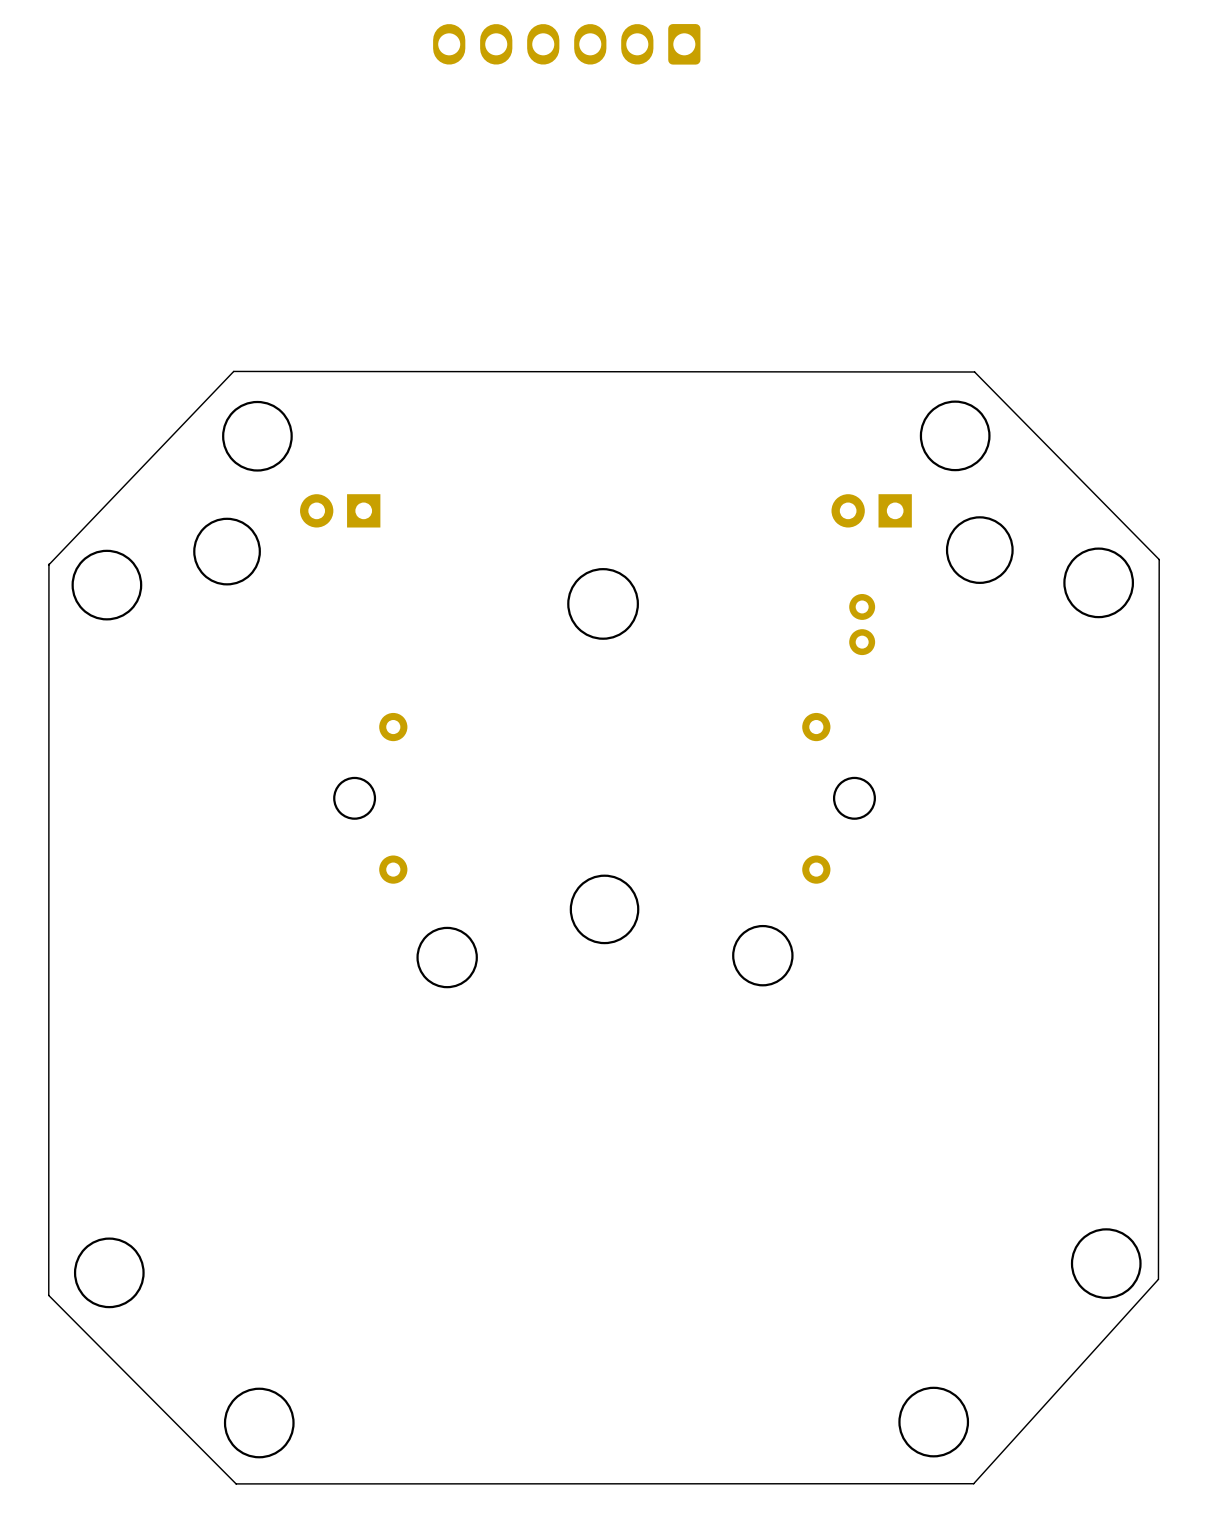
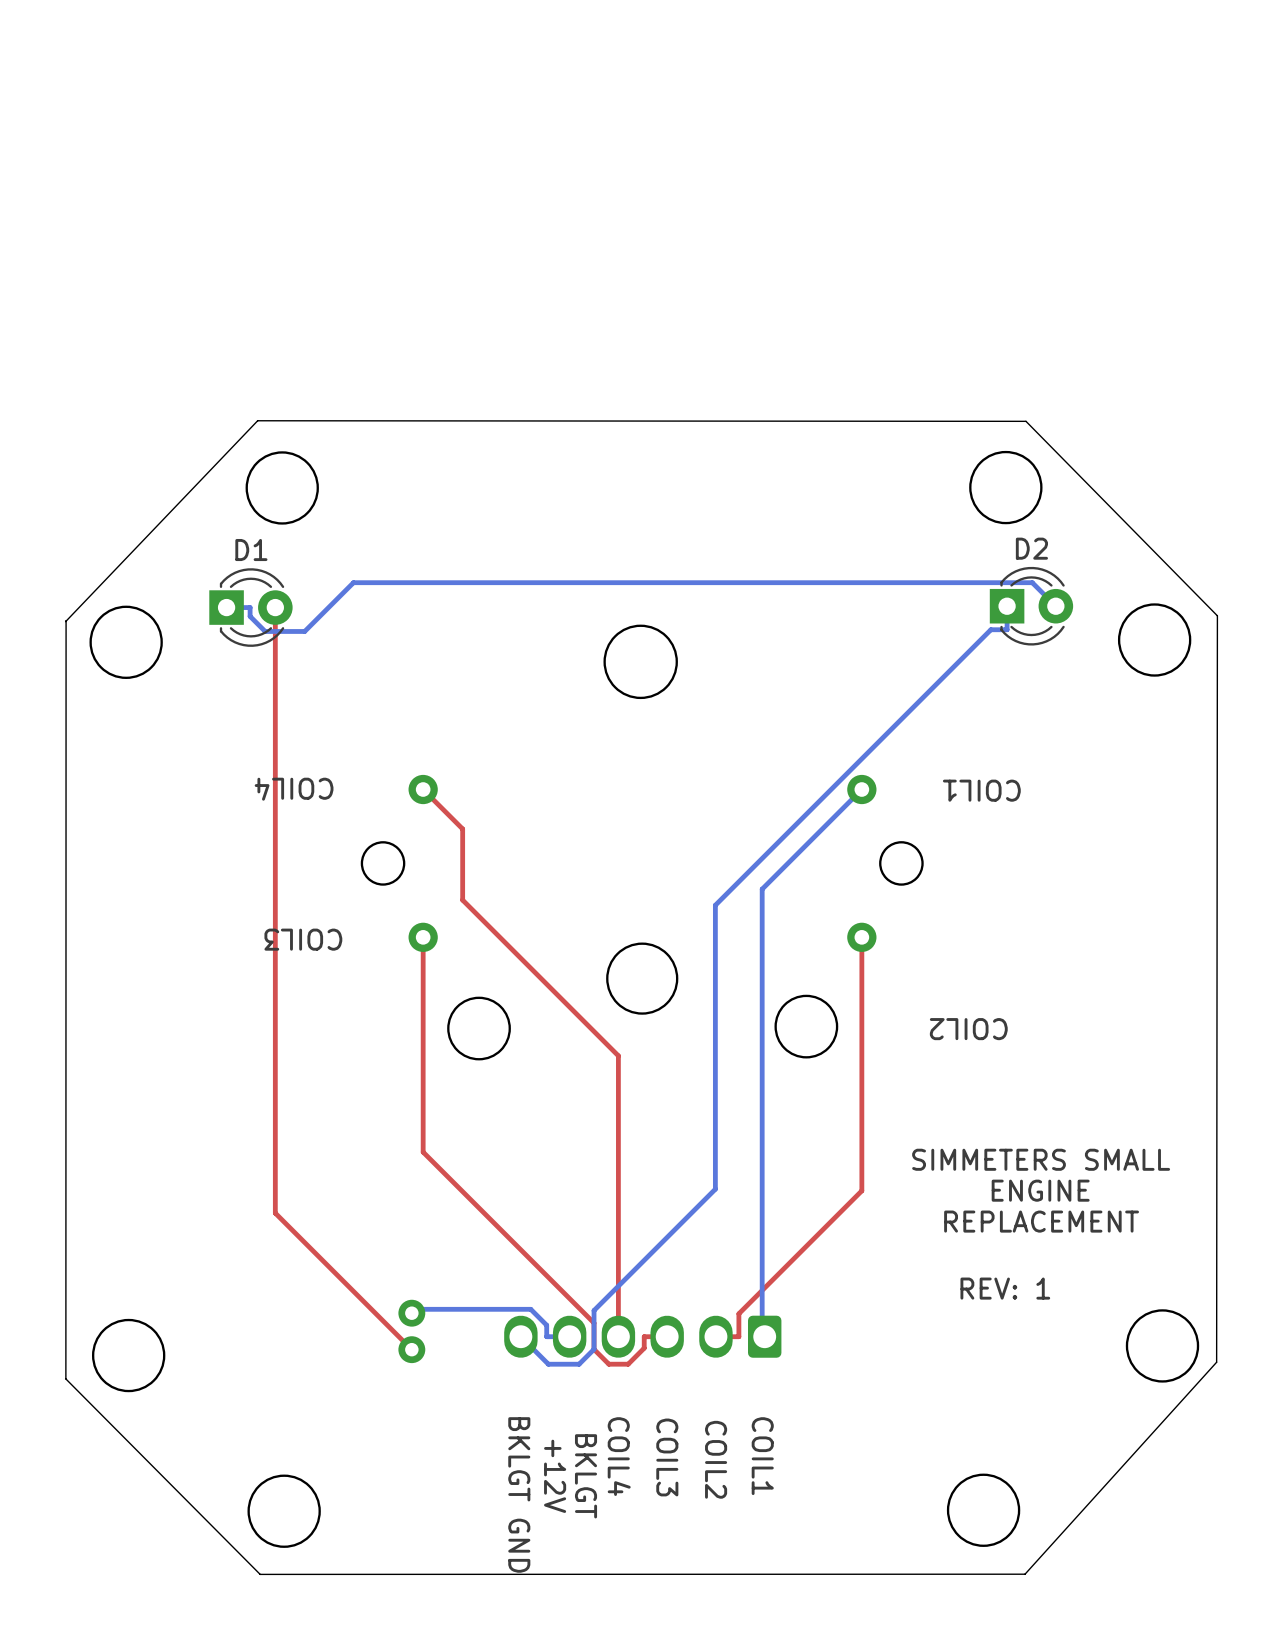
part: (566, 44) -> none
D1 side: top (340, 510) -> bottom (250, 607)
D2 side: top (871, 510) -> bottom (1031, 606)
round board edge: [945, 516, 1014, 584] -> none
round board edge: [193, 517, 261, 586] -> none
bottom track: none -> (1007, 606) (1007, 629) (990, 629) (715, 905) (715, 1189) (594, 1310) (594, 1349) (579, 1364) (548, 1364) (520, 1336)
bottom track: none -> (1055, 606) (1032, 582) (353, 582) (304, 631) (265, 631) (250, 616) (250, 607) (226, 607)
top track: none -> (275, 607) (275, 1213) (411, 1349)
part: (862, 624) -> none
text: none -> COIL4 (294, 789)
top track: none -> (423, 789) (462, 829) (462, 900) (618, 1055) (618, 1336)
bottom track: none -> (861, 789) (762, 889) (762, 1334) (764, 1336)
text: none -> COIL1 (981, 790)
top track: none -> (423, 937) (423, 1152) (594, 1323) (594, 1349) (608, 1364) (628, 1364) (644, 1348) (644, 1336) (667, 1336)
top track: none -> (861, 937) (861, 1190) (738, 1313) (738, 1336) (715, 1336)
text: none -> COIL3 (303, 939)
text: none -> COIL2 (968, 1029)
text: none -> SIMMETERS SMALL (1041, 1159)
text: none -> ENGINE (1040, 1190)
text: none -> REPLACEMENT (1041, 1221)
text: none -> REV: 1 (1005, 1288)
bottom track: none -> (411, 1313) (415, 1309) (530, 1309) (546, 1325) (546, 1336) (569, 1336)
part: none -> (411, 1331)
part: none -> (642, 1336)
text: none -> COIL1 (762, 1456)
text: none -> COIL4 (619, 1456)
text: none -> COIL3 (667, 1457)
text: none -> COIL2 (716, 1459)
text: none -> +12V (555, 1476)
text: none -> BKLGT (586, 1476)
text: none -> BKLGT GND (519, 1494)

